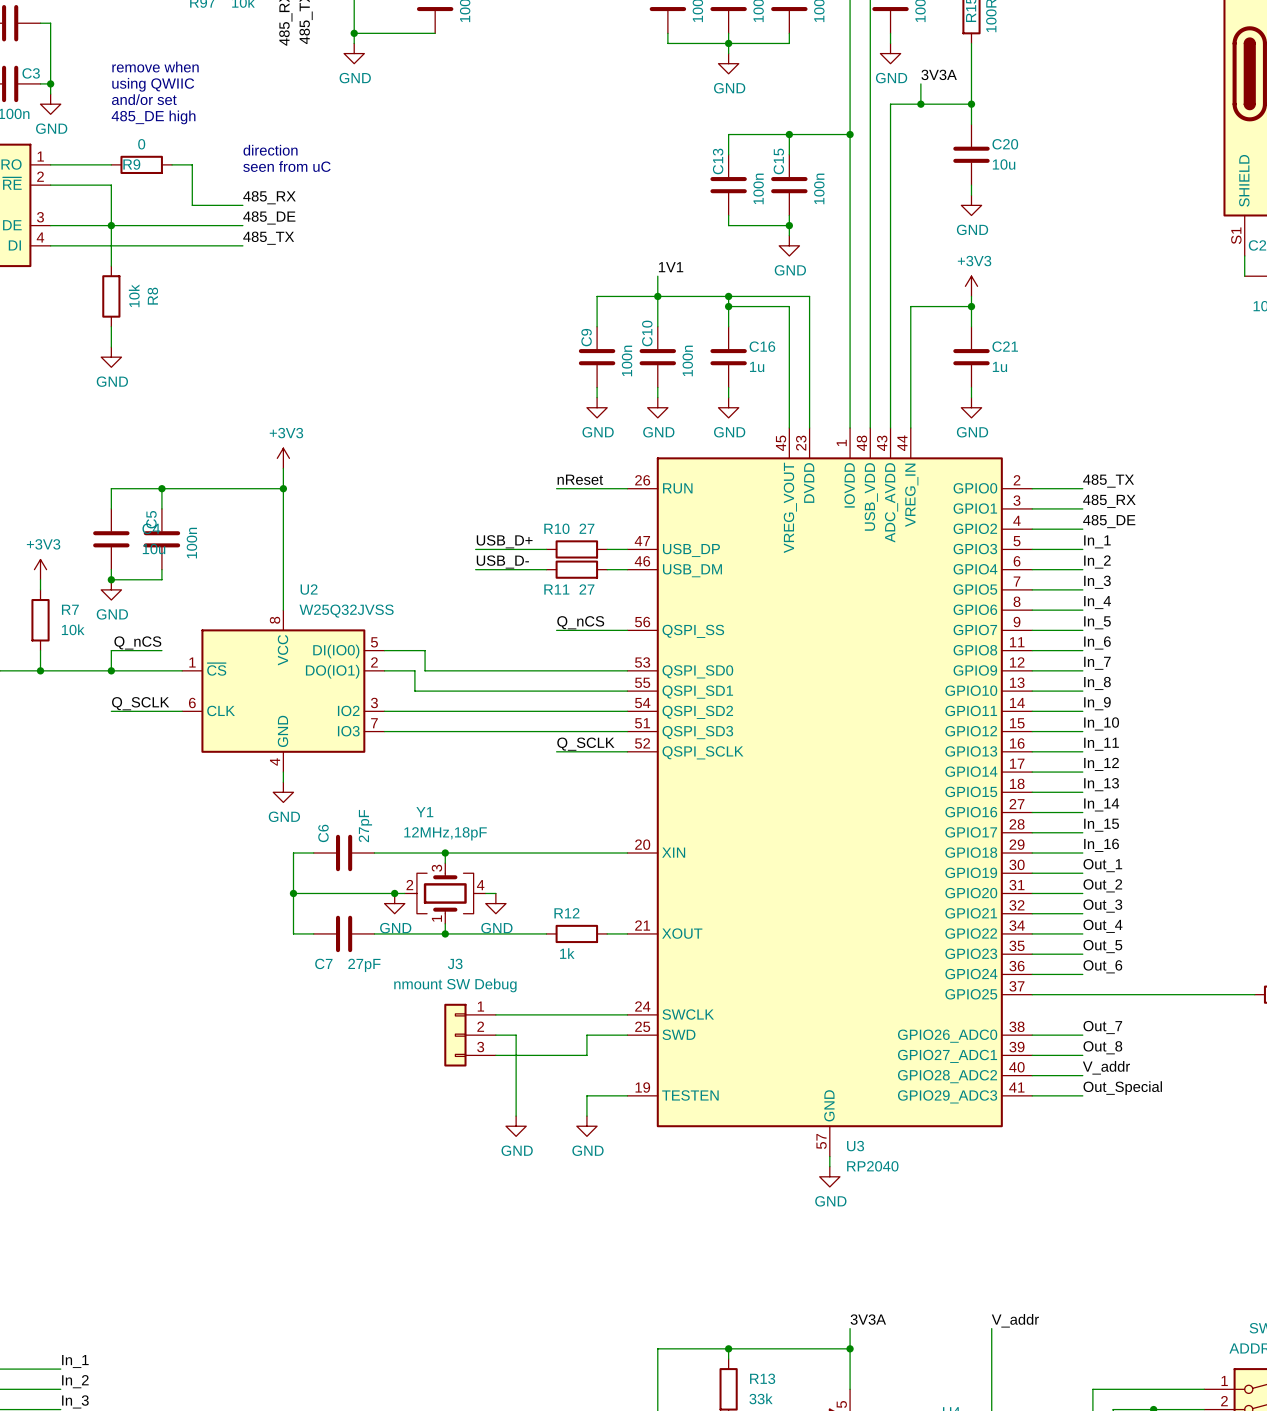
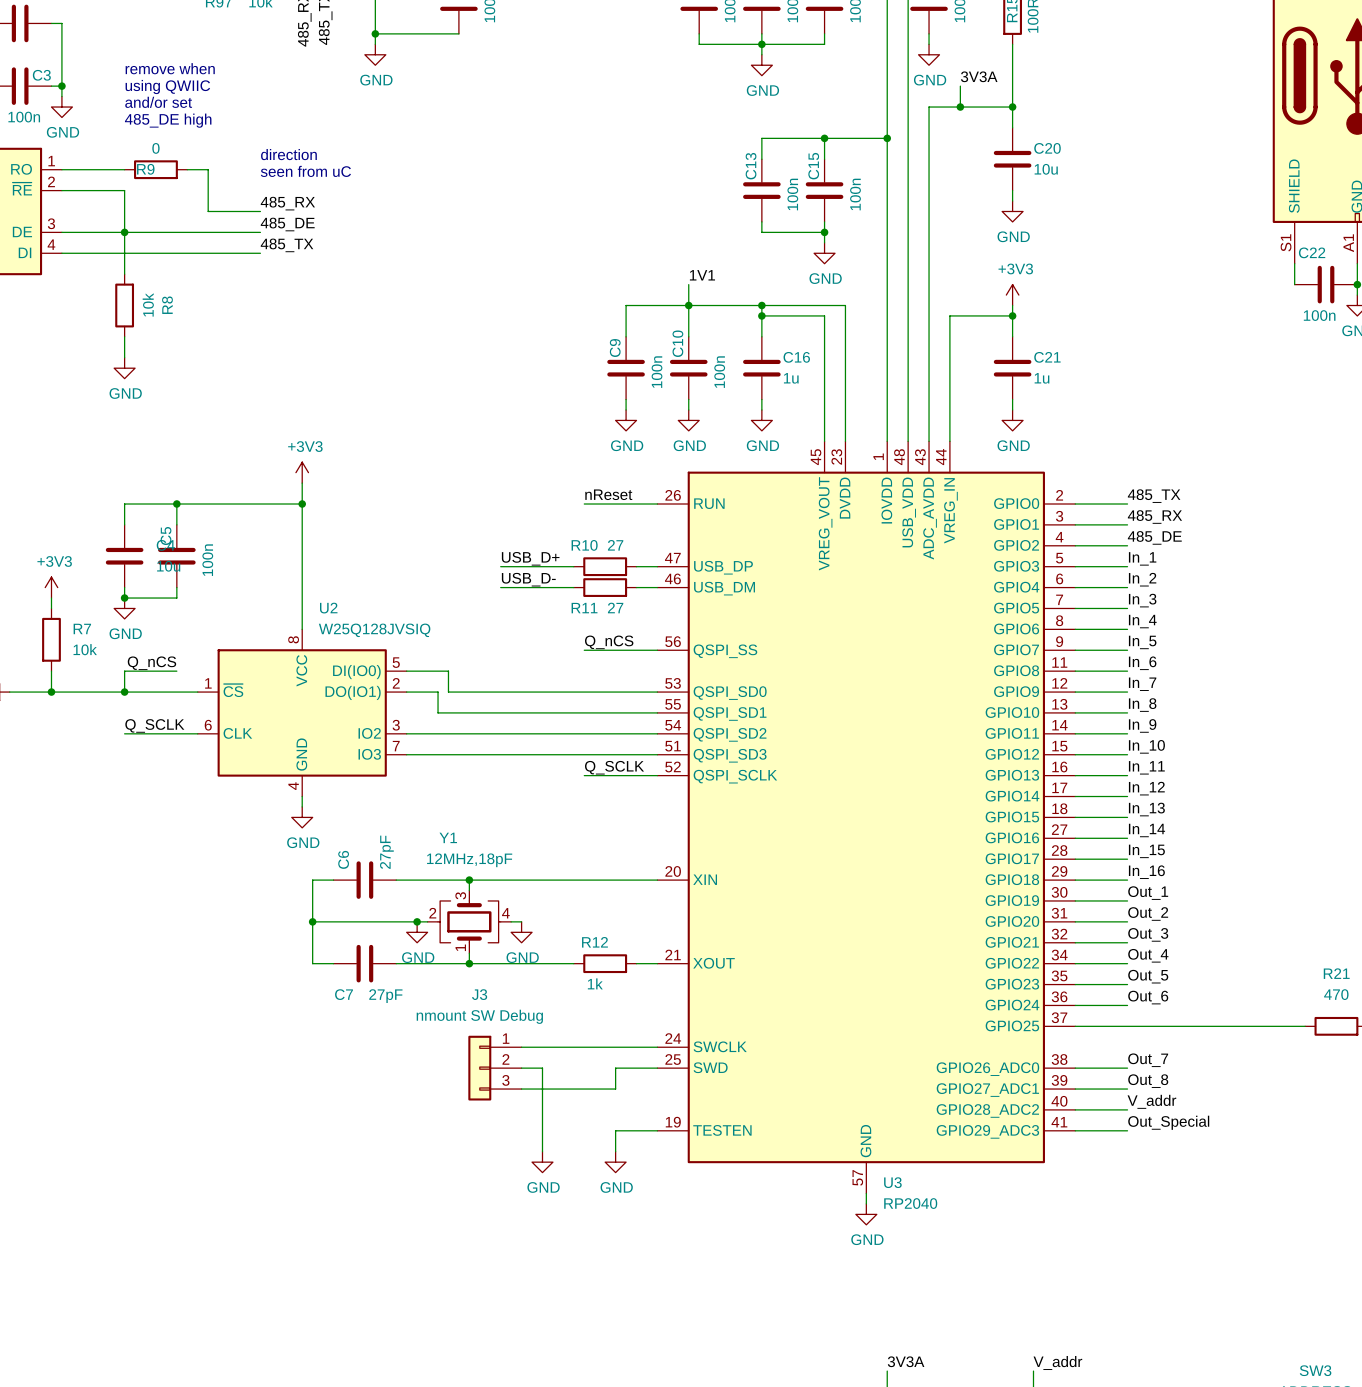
U2 value: W25Q32JVSS (346, 611) -> W25Q128JVSIQ (374, 630)

